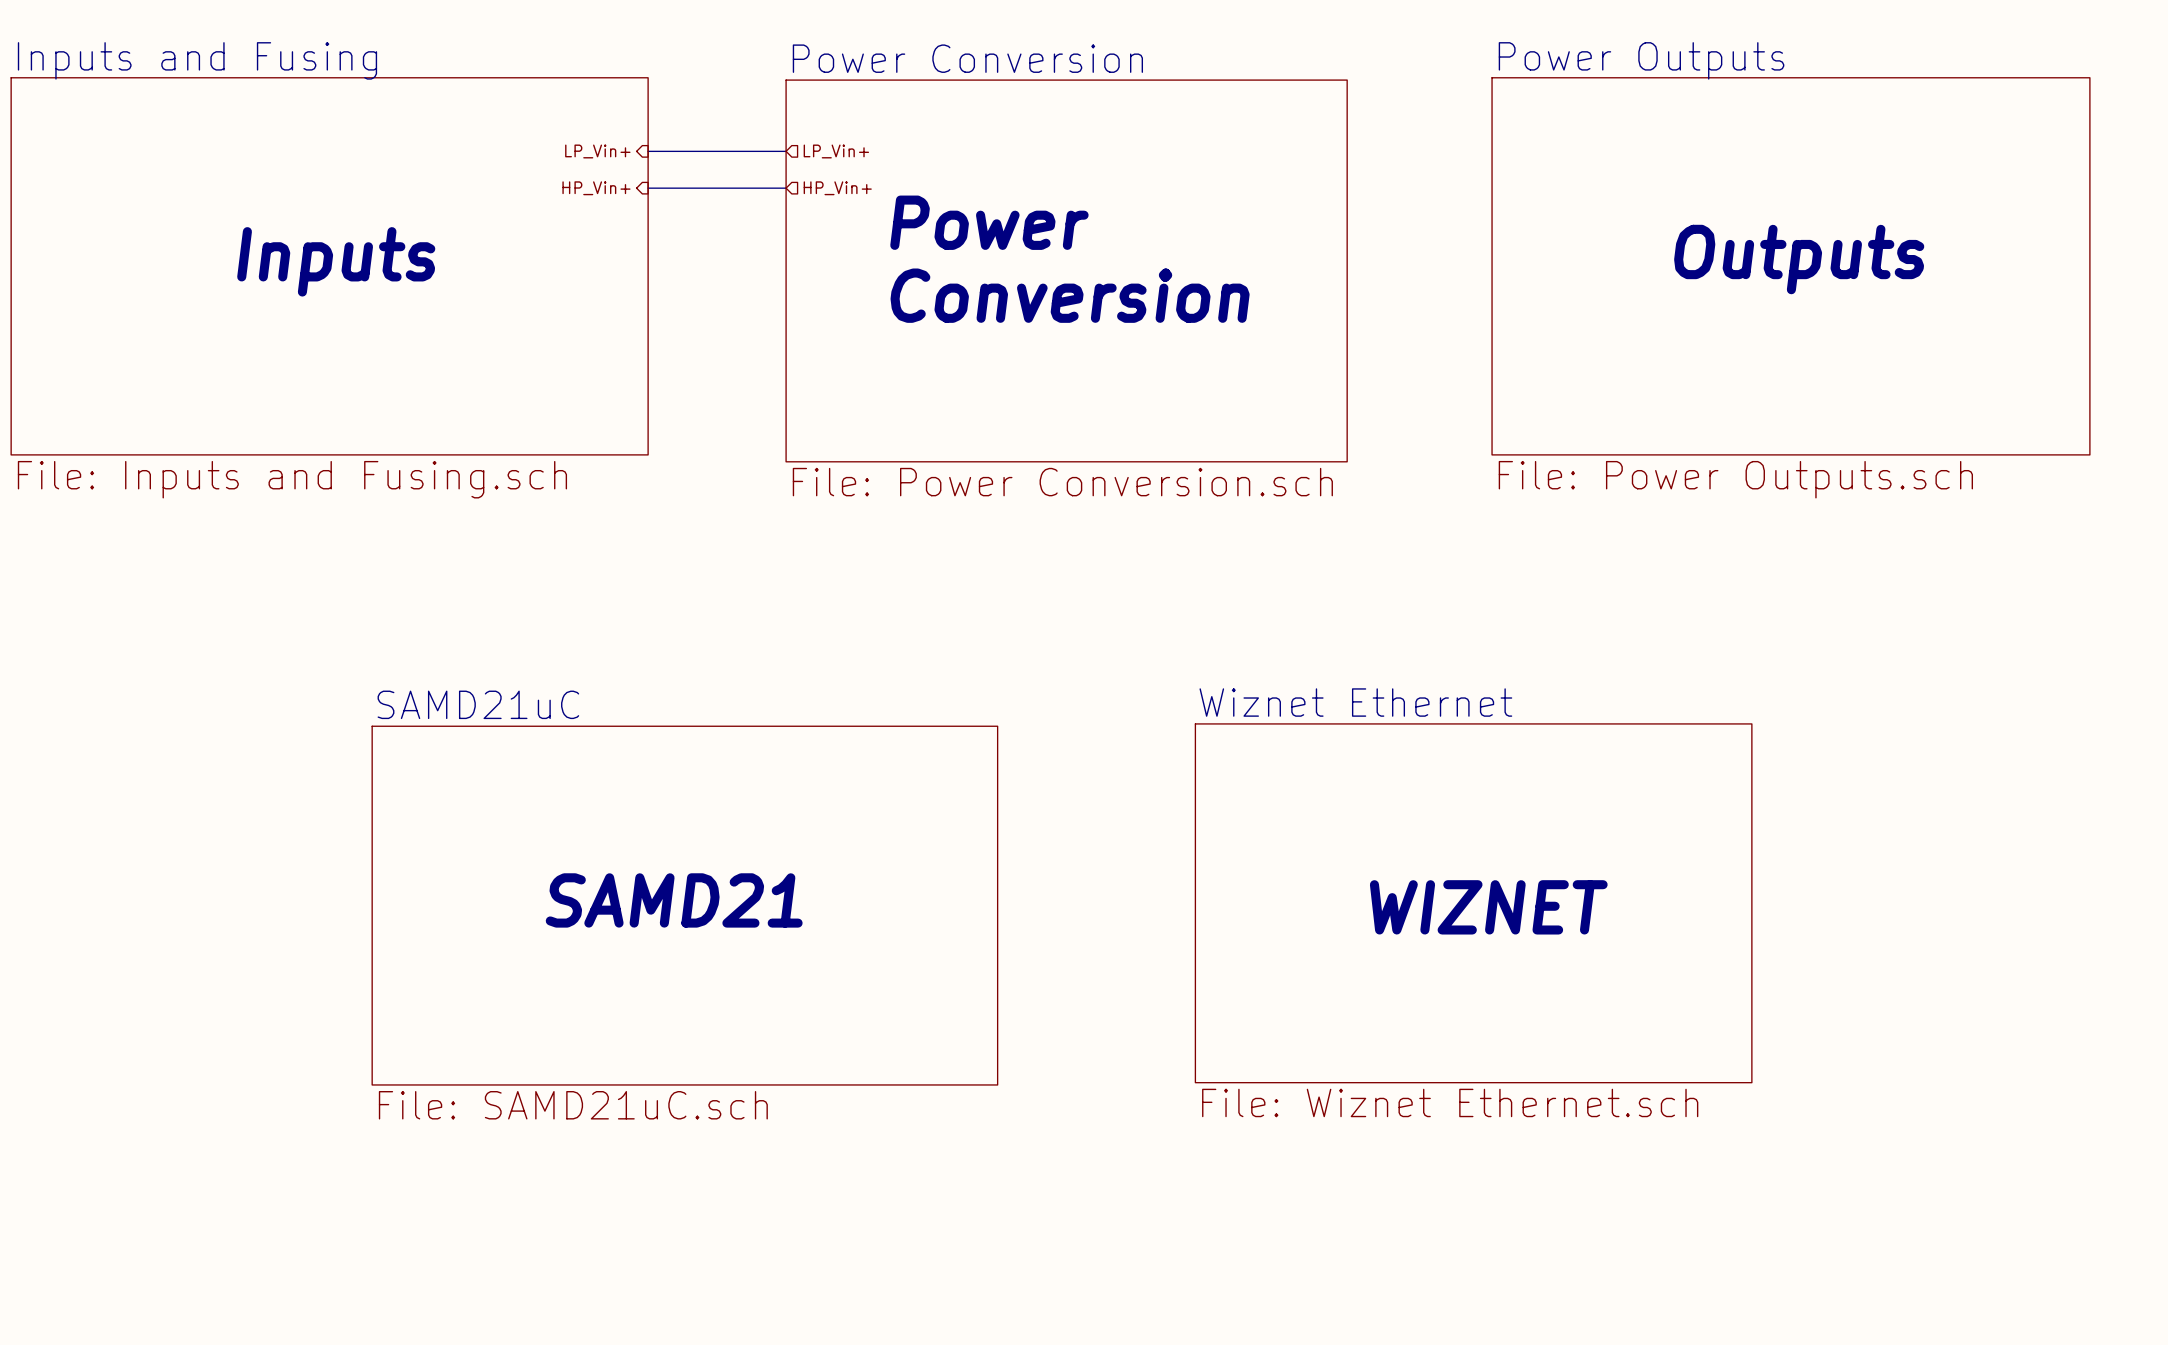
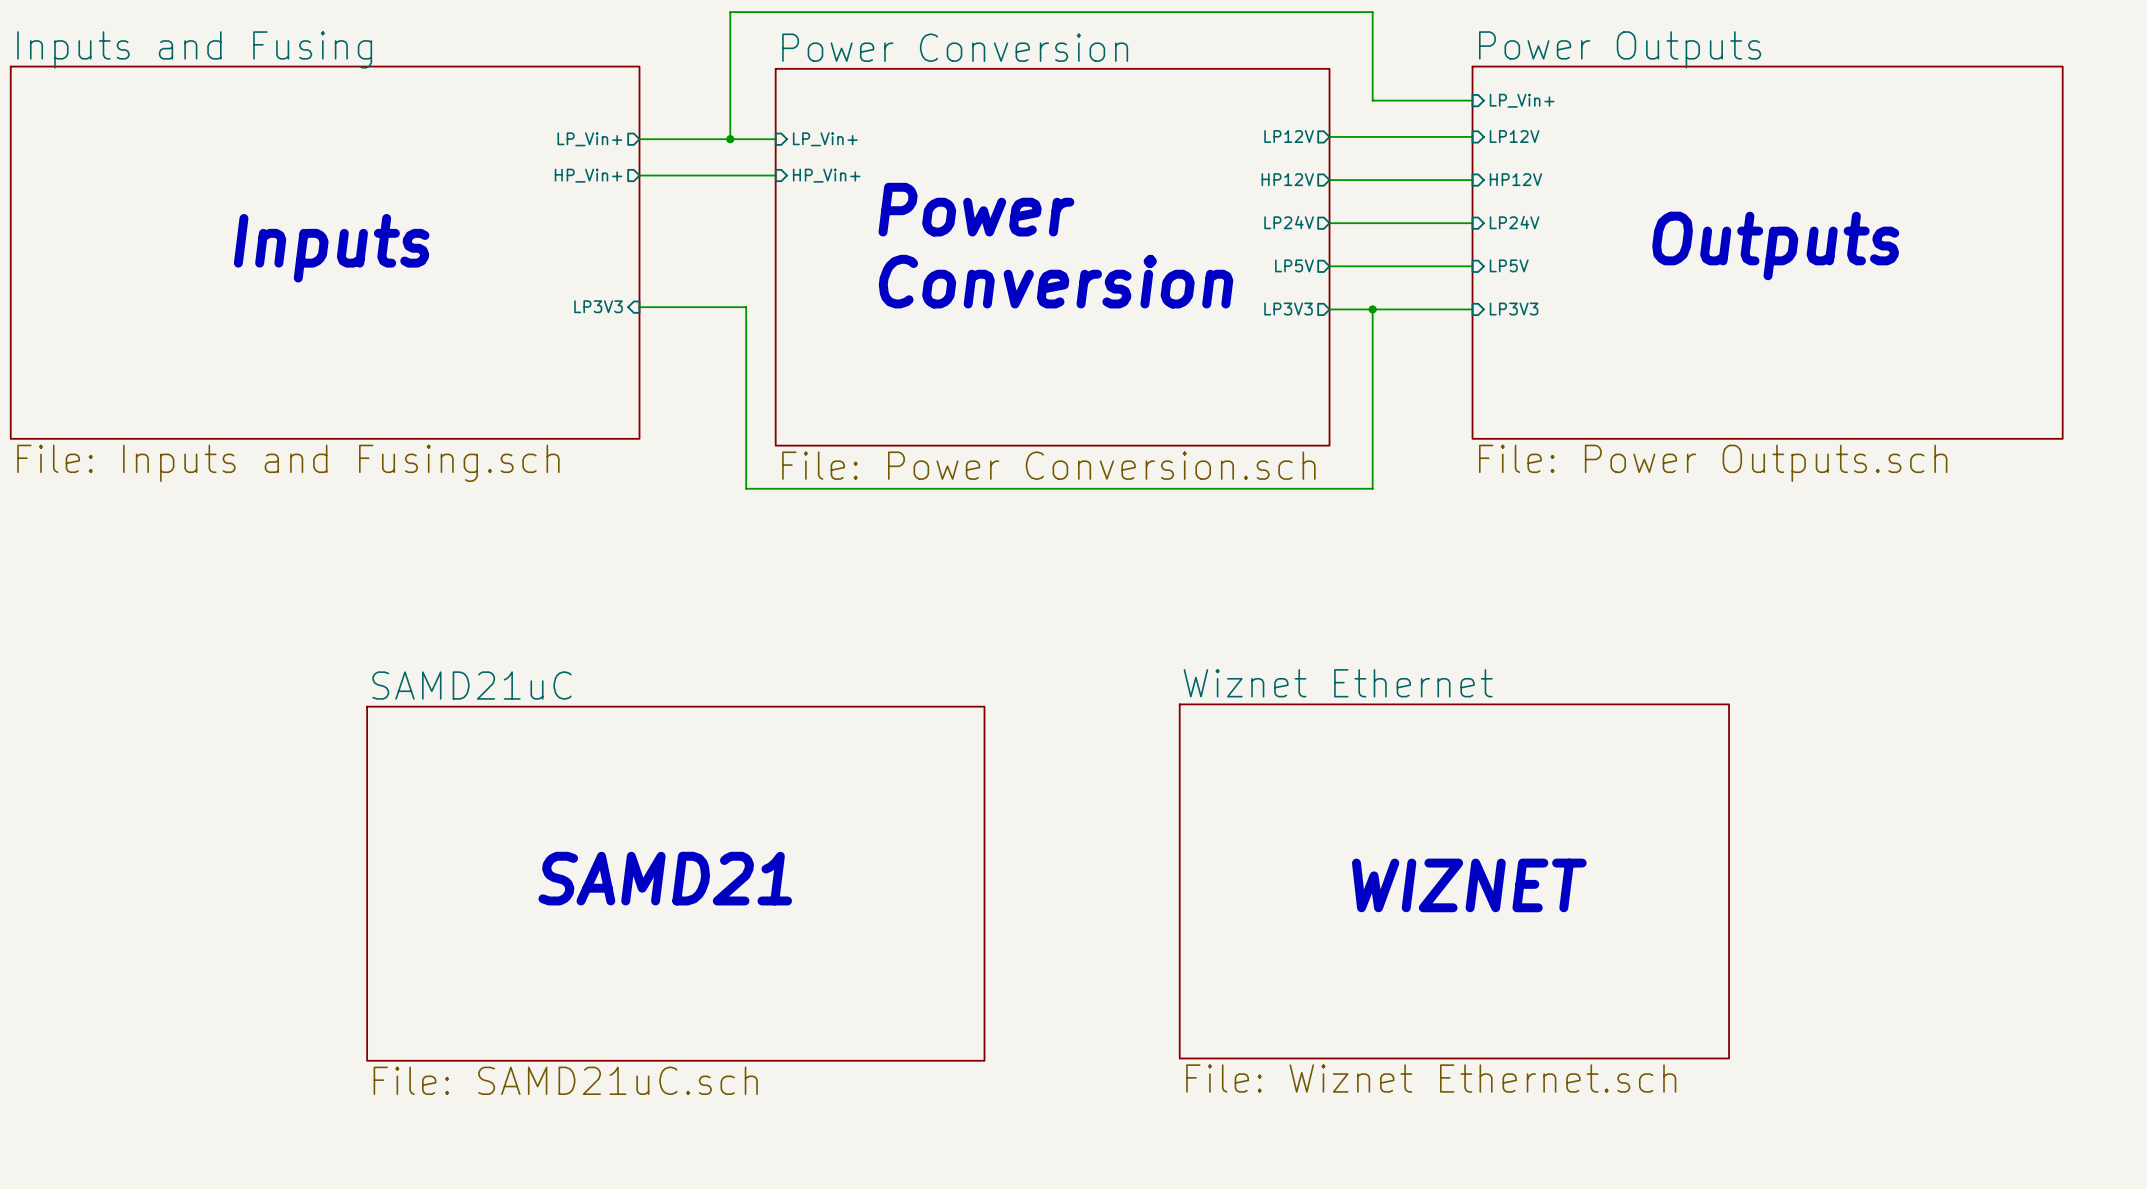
wire: none -> (1472, 100) (1372, 100) (1372, 12) (730, 12) (730, 139)
sheet pin: none -> LP_Vin+ (1522, 100)
sheet pin: none -> LP12V (1289, 136)
sheet pin: none -> LP12V (1514, 136)
wire: none -> (1329, 136) (1472, 136)
hierarchical label: LP_Vin+ (597, 151) -> none
sheet pin: none -> LP_Vin+ (589, 139)
junction: none -> (730, 139)
hierarchical label: LP_Vin+ (836, 151) -> none
sheet pin: none -> LP_Vin+ (825, 139)
hierarchical label: HP_Vin+ (596, 188) -> none
sheet pin: none -> HP_Vin+ (588, 175)
hierarchical label: HP_Vin+ (837, 188) -> none
sheet pin: none -> HP_Vin+ (826, 175)
sheet pin: none -> HP12V (1287, 179)
wire: none -> (1329, 180) (1472, 180)
sheet pin: none -> HP12V (1515, 179)
sheet pin: none -> LP24V (1289, 222)
sheet pin: none -> LP24V (1514, 222)
wire: none -> (1329, 223) (1472, 223)
sheet pin: none -> LP5V (1294, 265)
sheet pin: none -> LP5V (1509, 265)
wire: none -> (1329, 266) (1472, 266)
sheet pin: none -> LP3V3 (598, 306)
wire: none -> (639, 307) (746, 307) (746, 488) (1372, 488) (1372, 309)
sheet pin: none -> LP3V3 (1288, 309)
wire: none -> (1329, 309) (1472, 309)
junction: none -> (1372, 309)
sheet pin: none -> LP3V3 (1514, 309)

